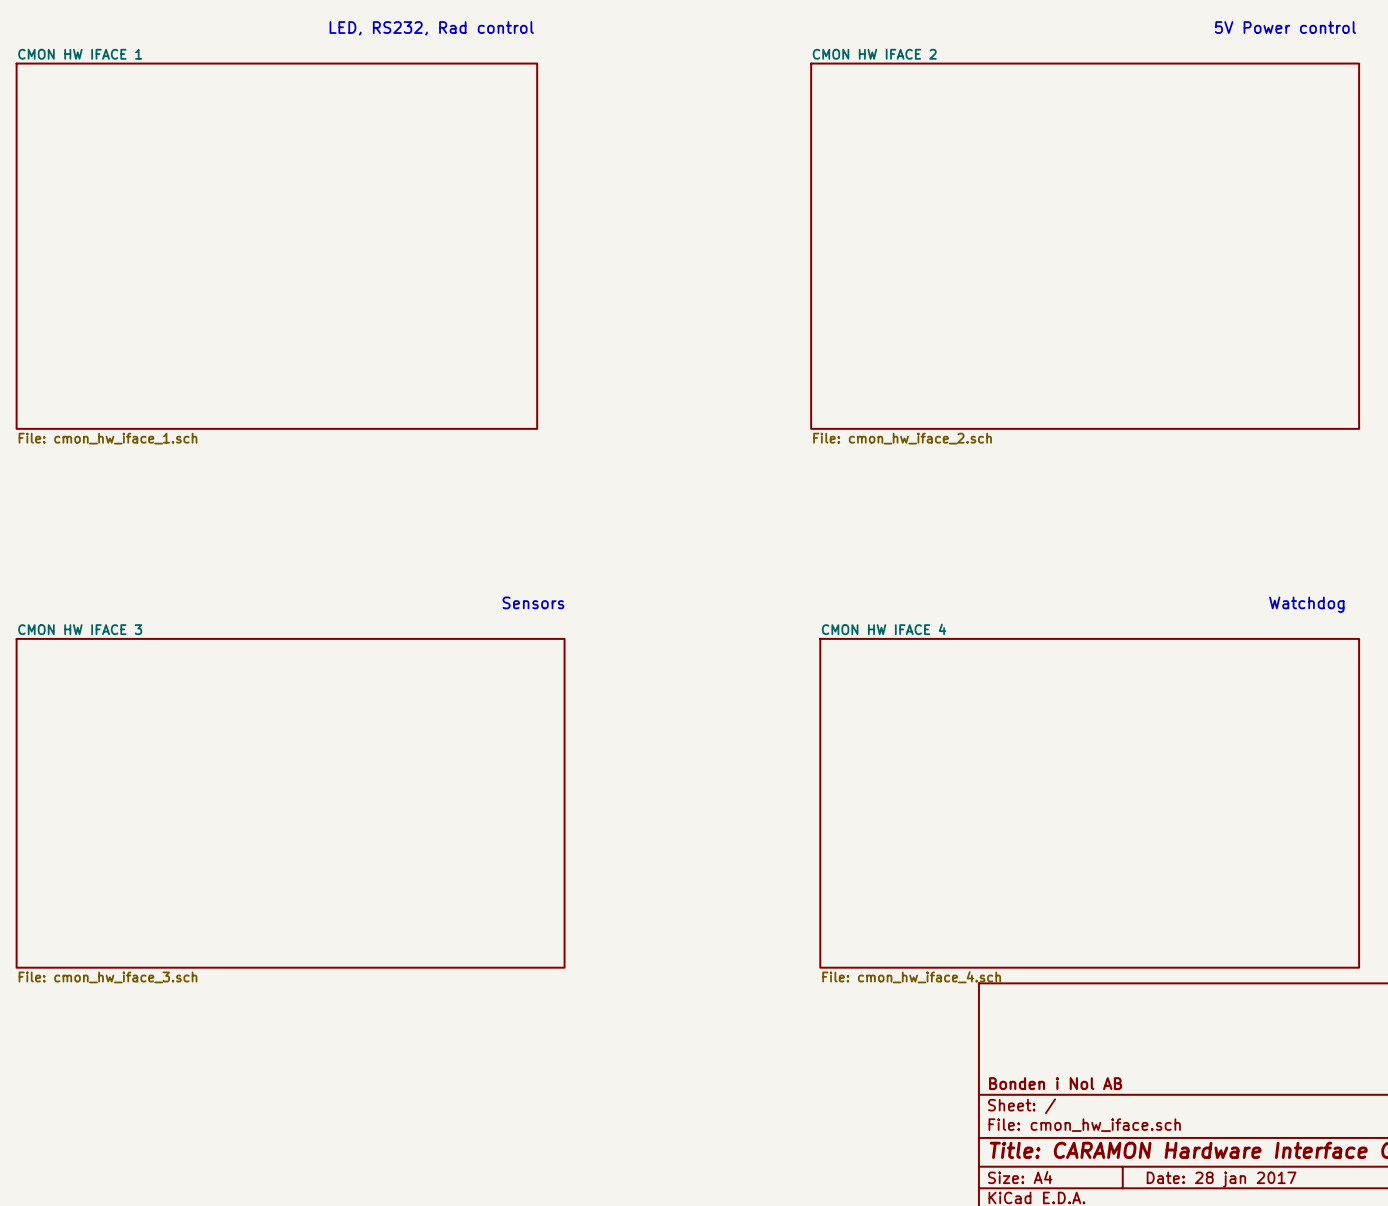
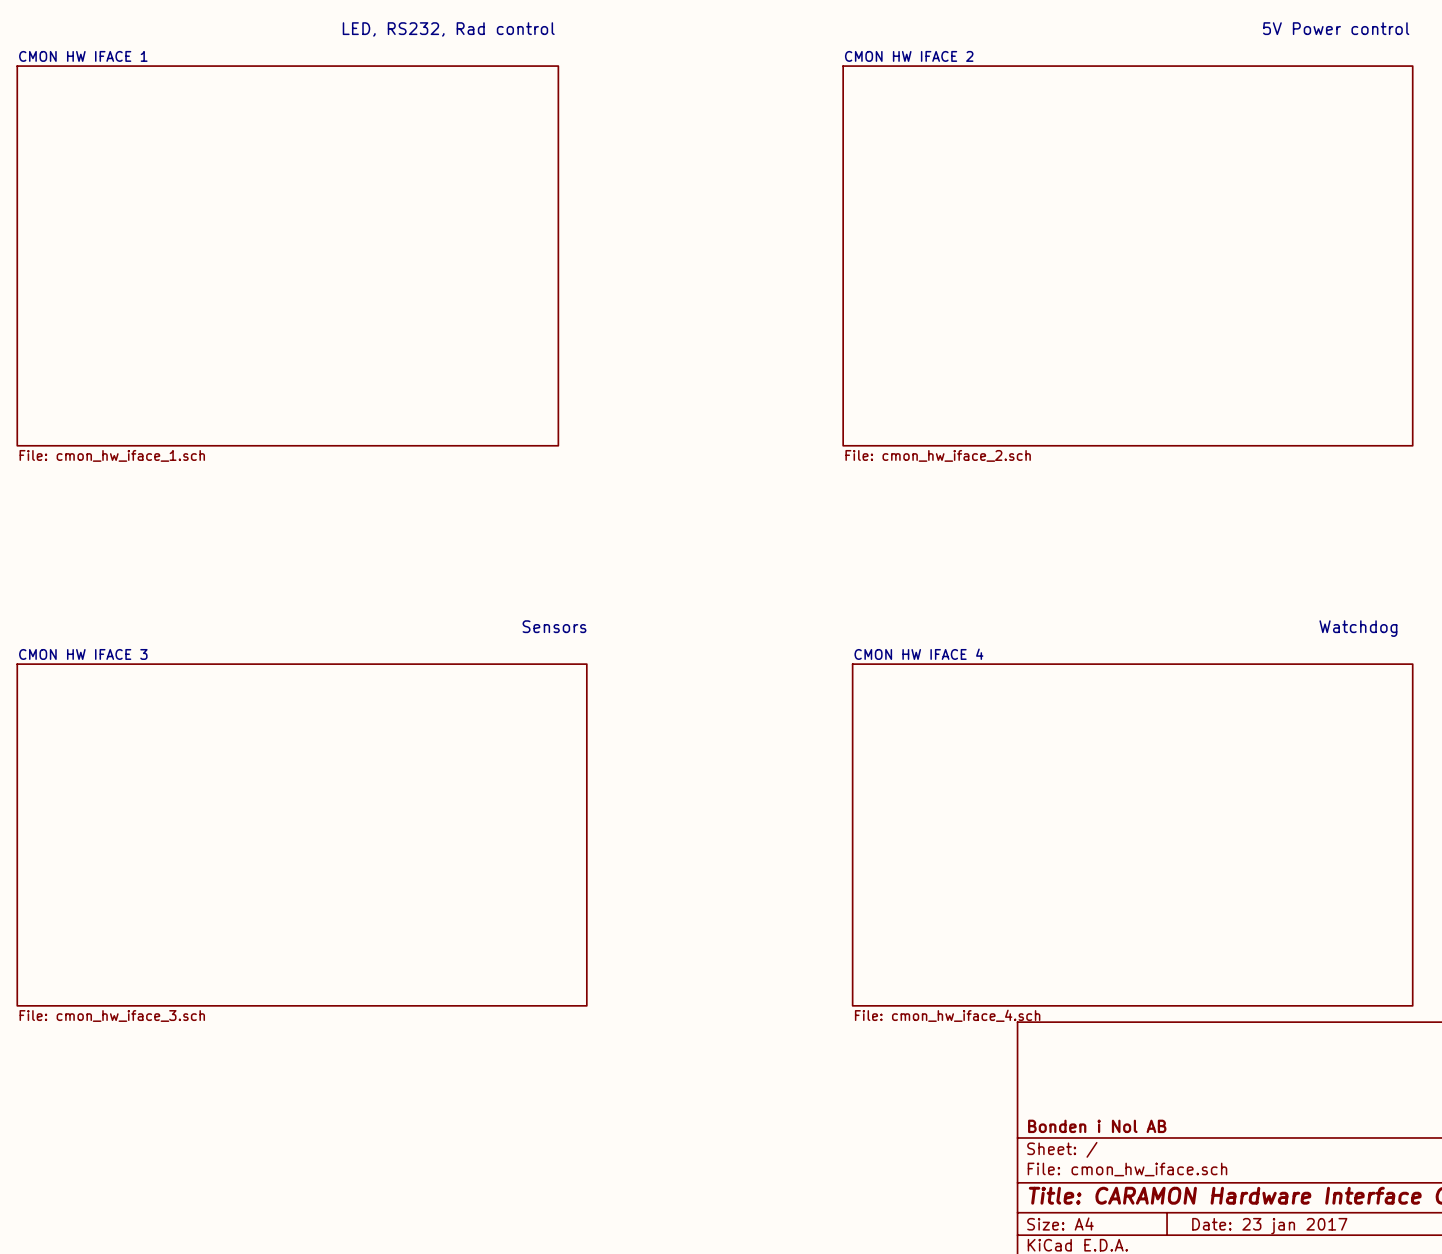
title block: Date: 28 jan 2017 (1221, 1179) -> Date: 23 jan 2017 (1269, 1226)

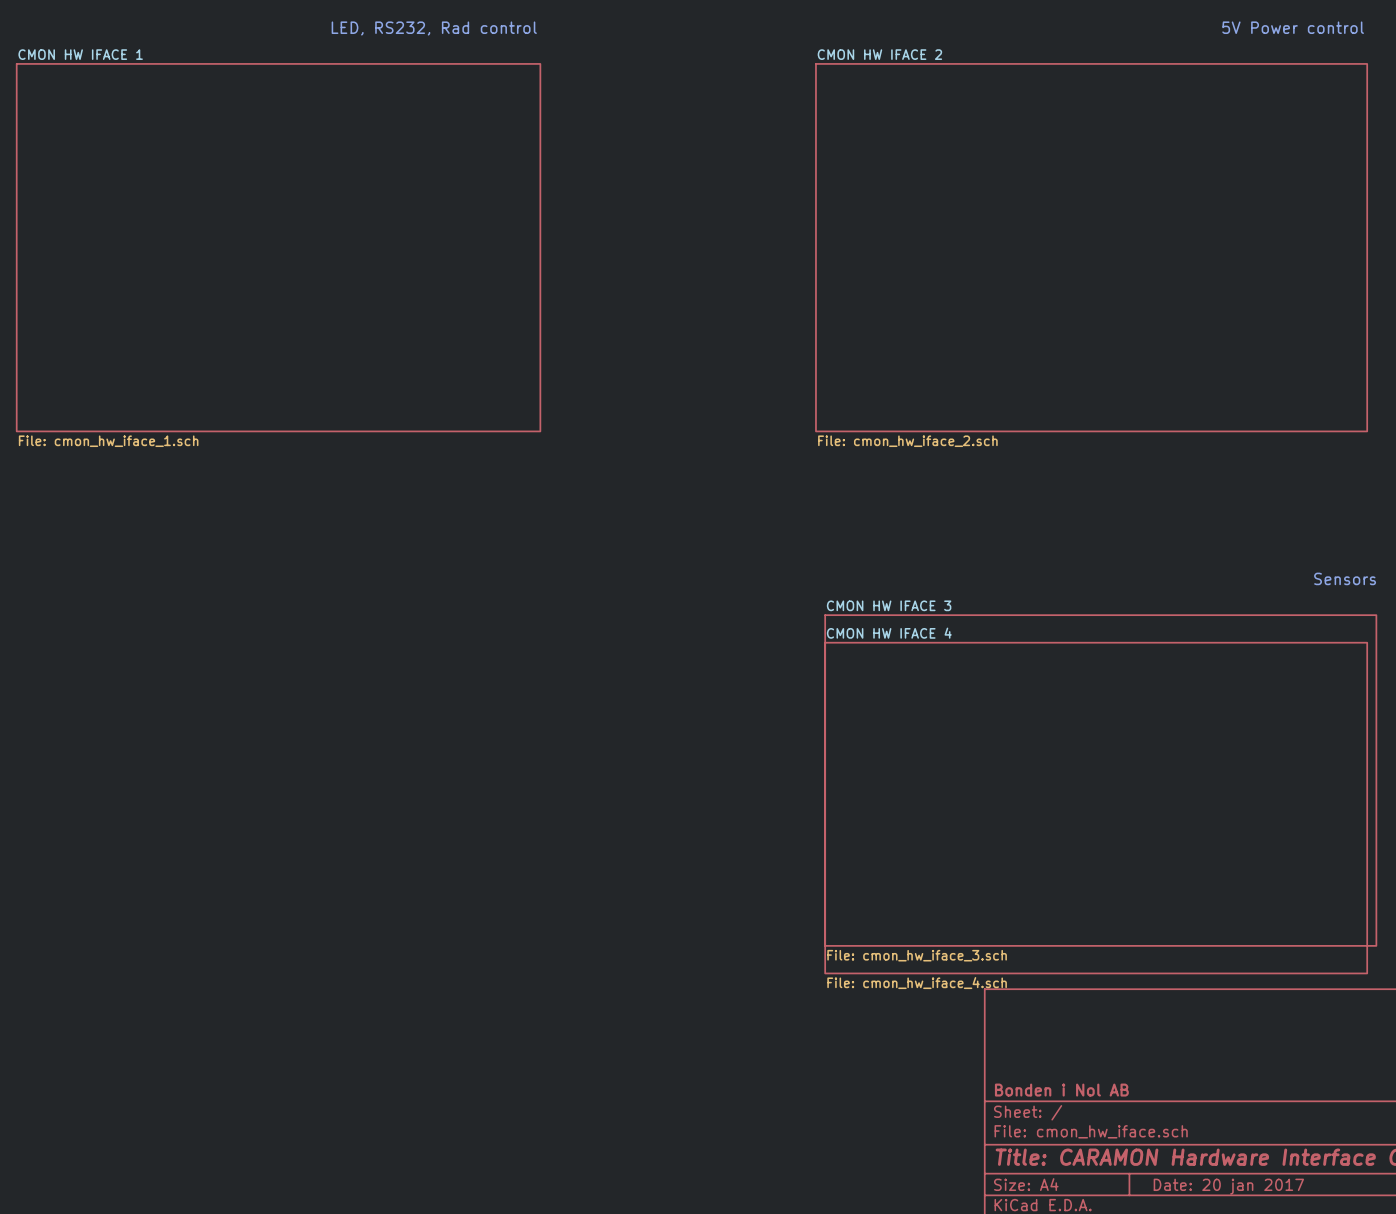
text: none -> Sensors (1345, 578)
text: Sensors (554, 626) -> none
text: Watchdog (1358, 628) -> none
sheet CMON HW IFACE 3 position: (302, 834) -> (1100, 780)
title block: Date: 23 jan 2017 (1269, 1226) -> Date: 20 jan 2017 (1228, 1186)

